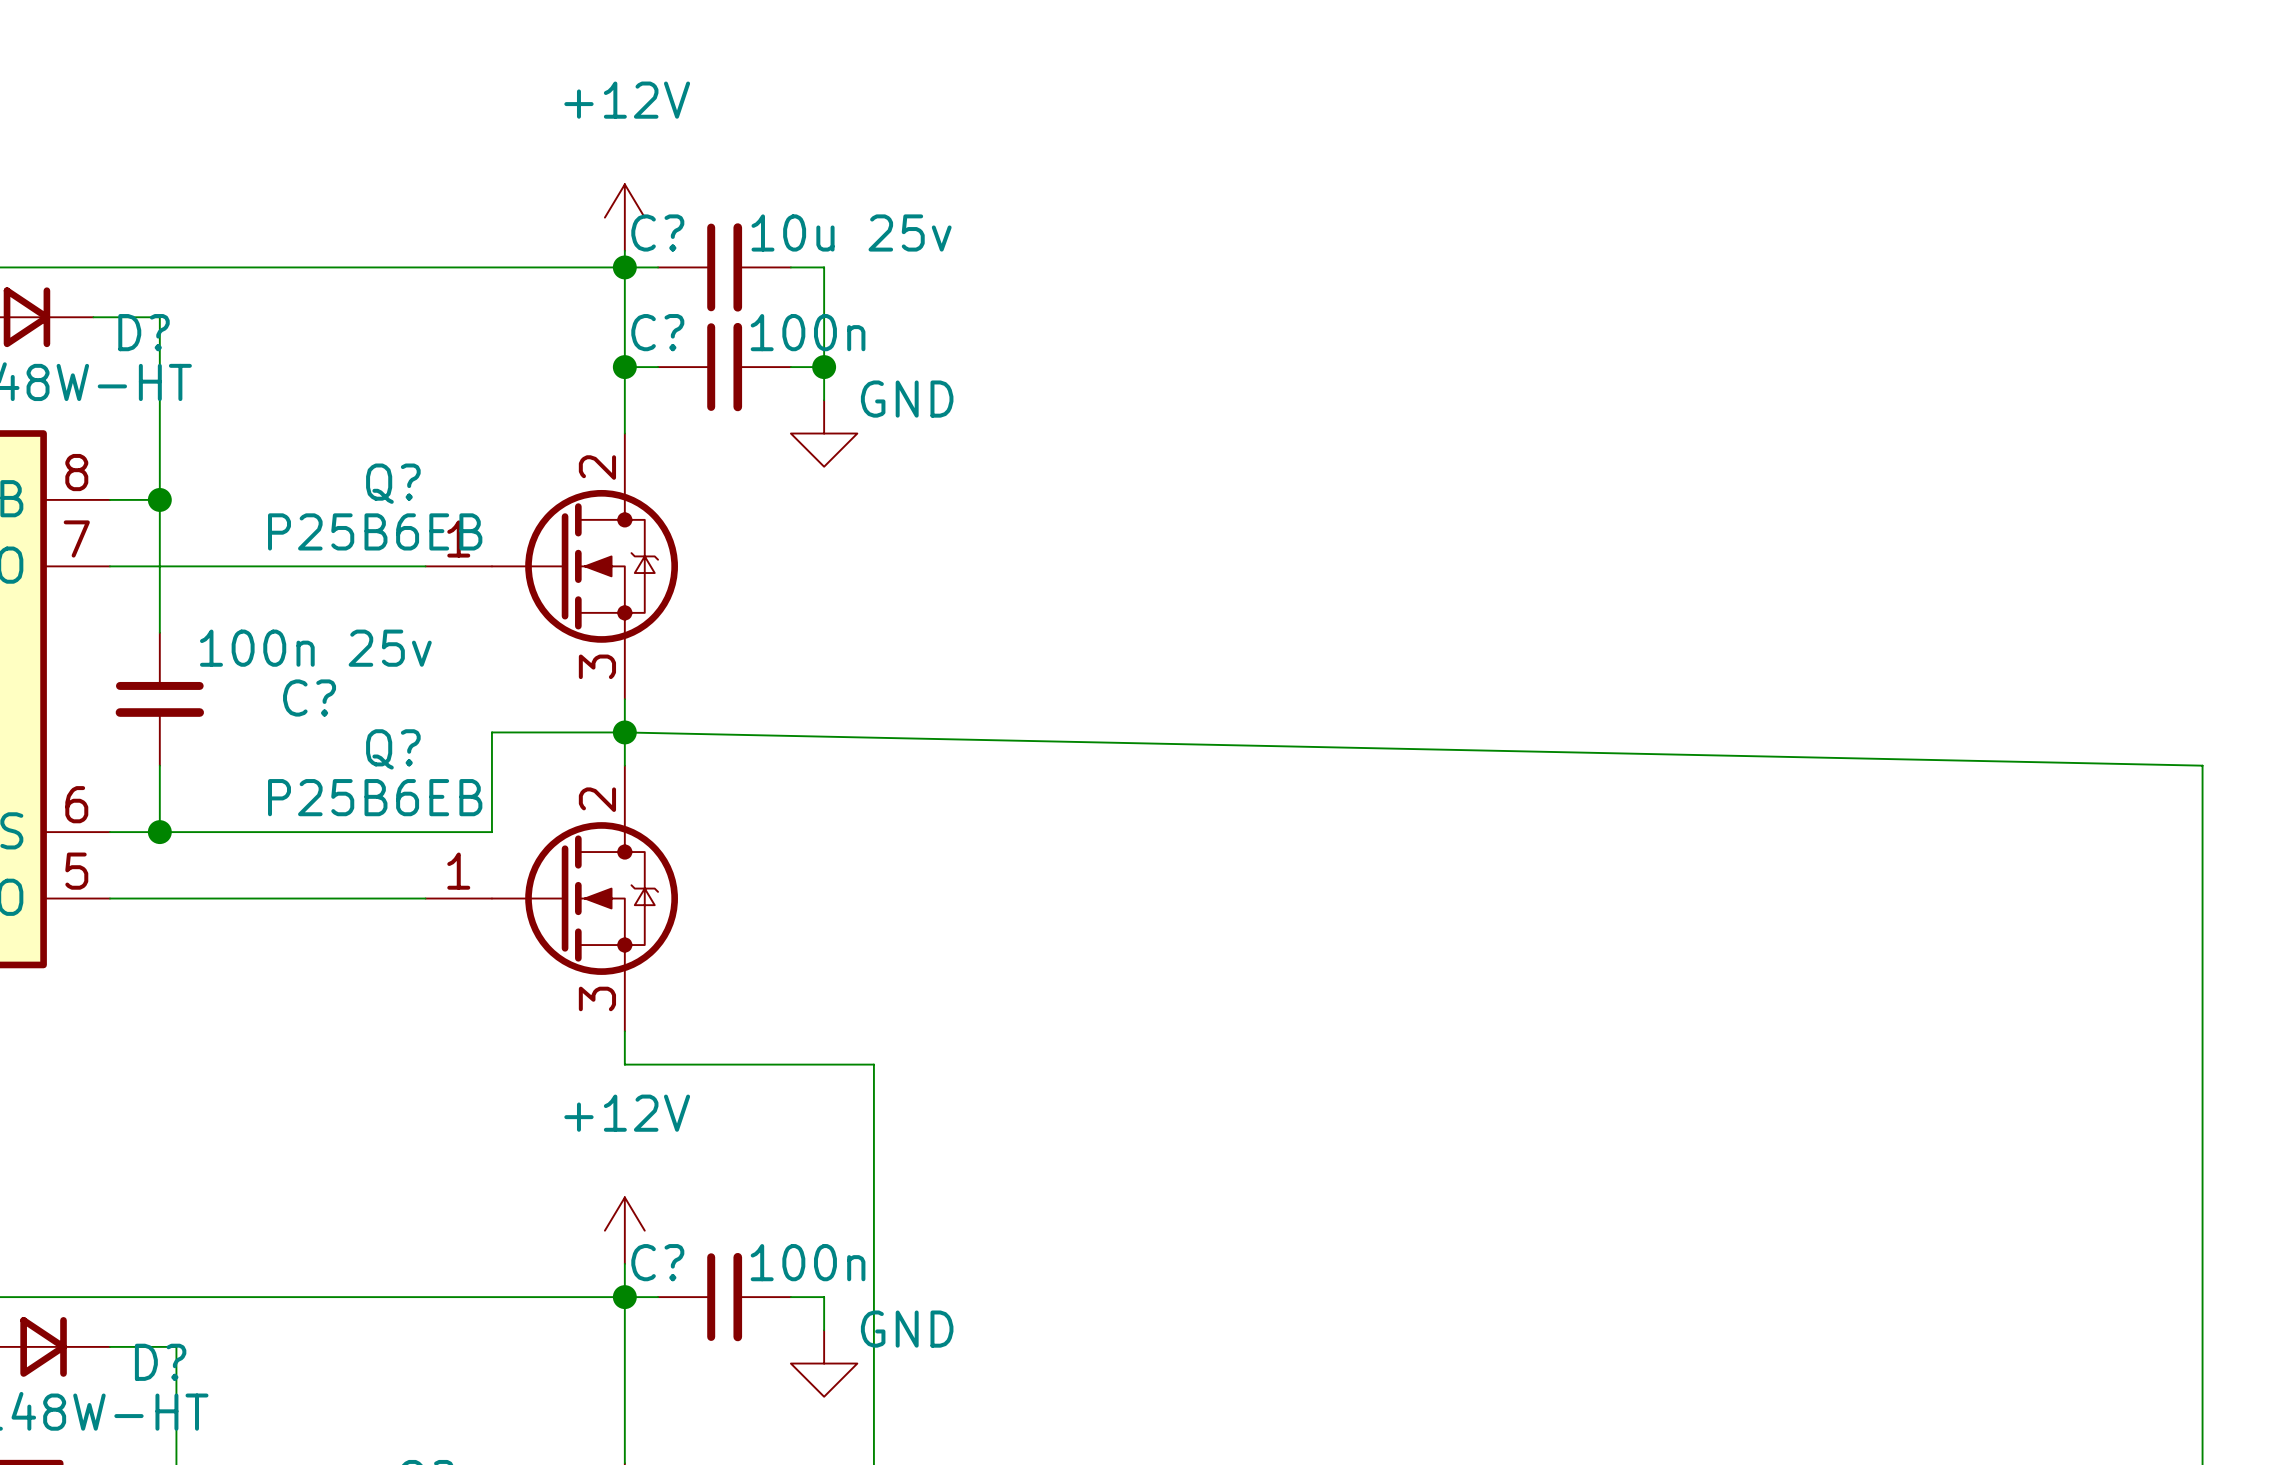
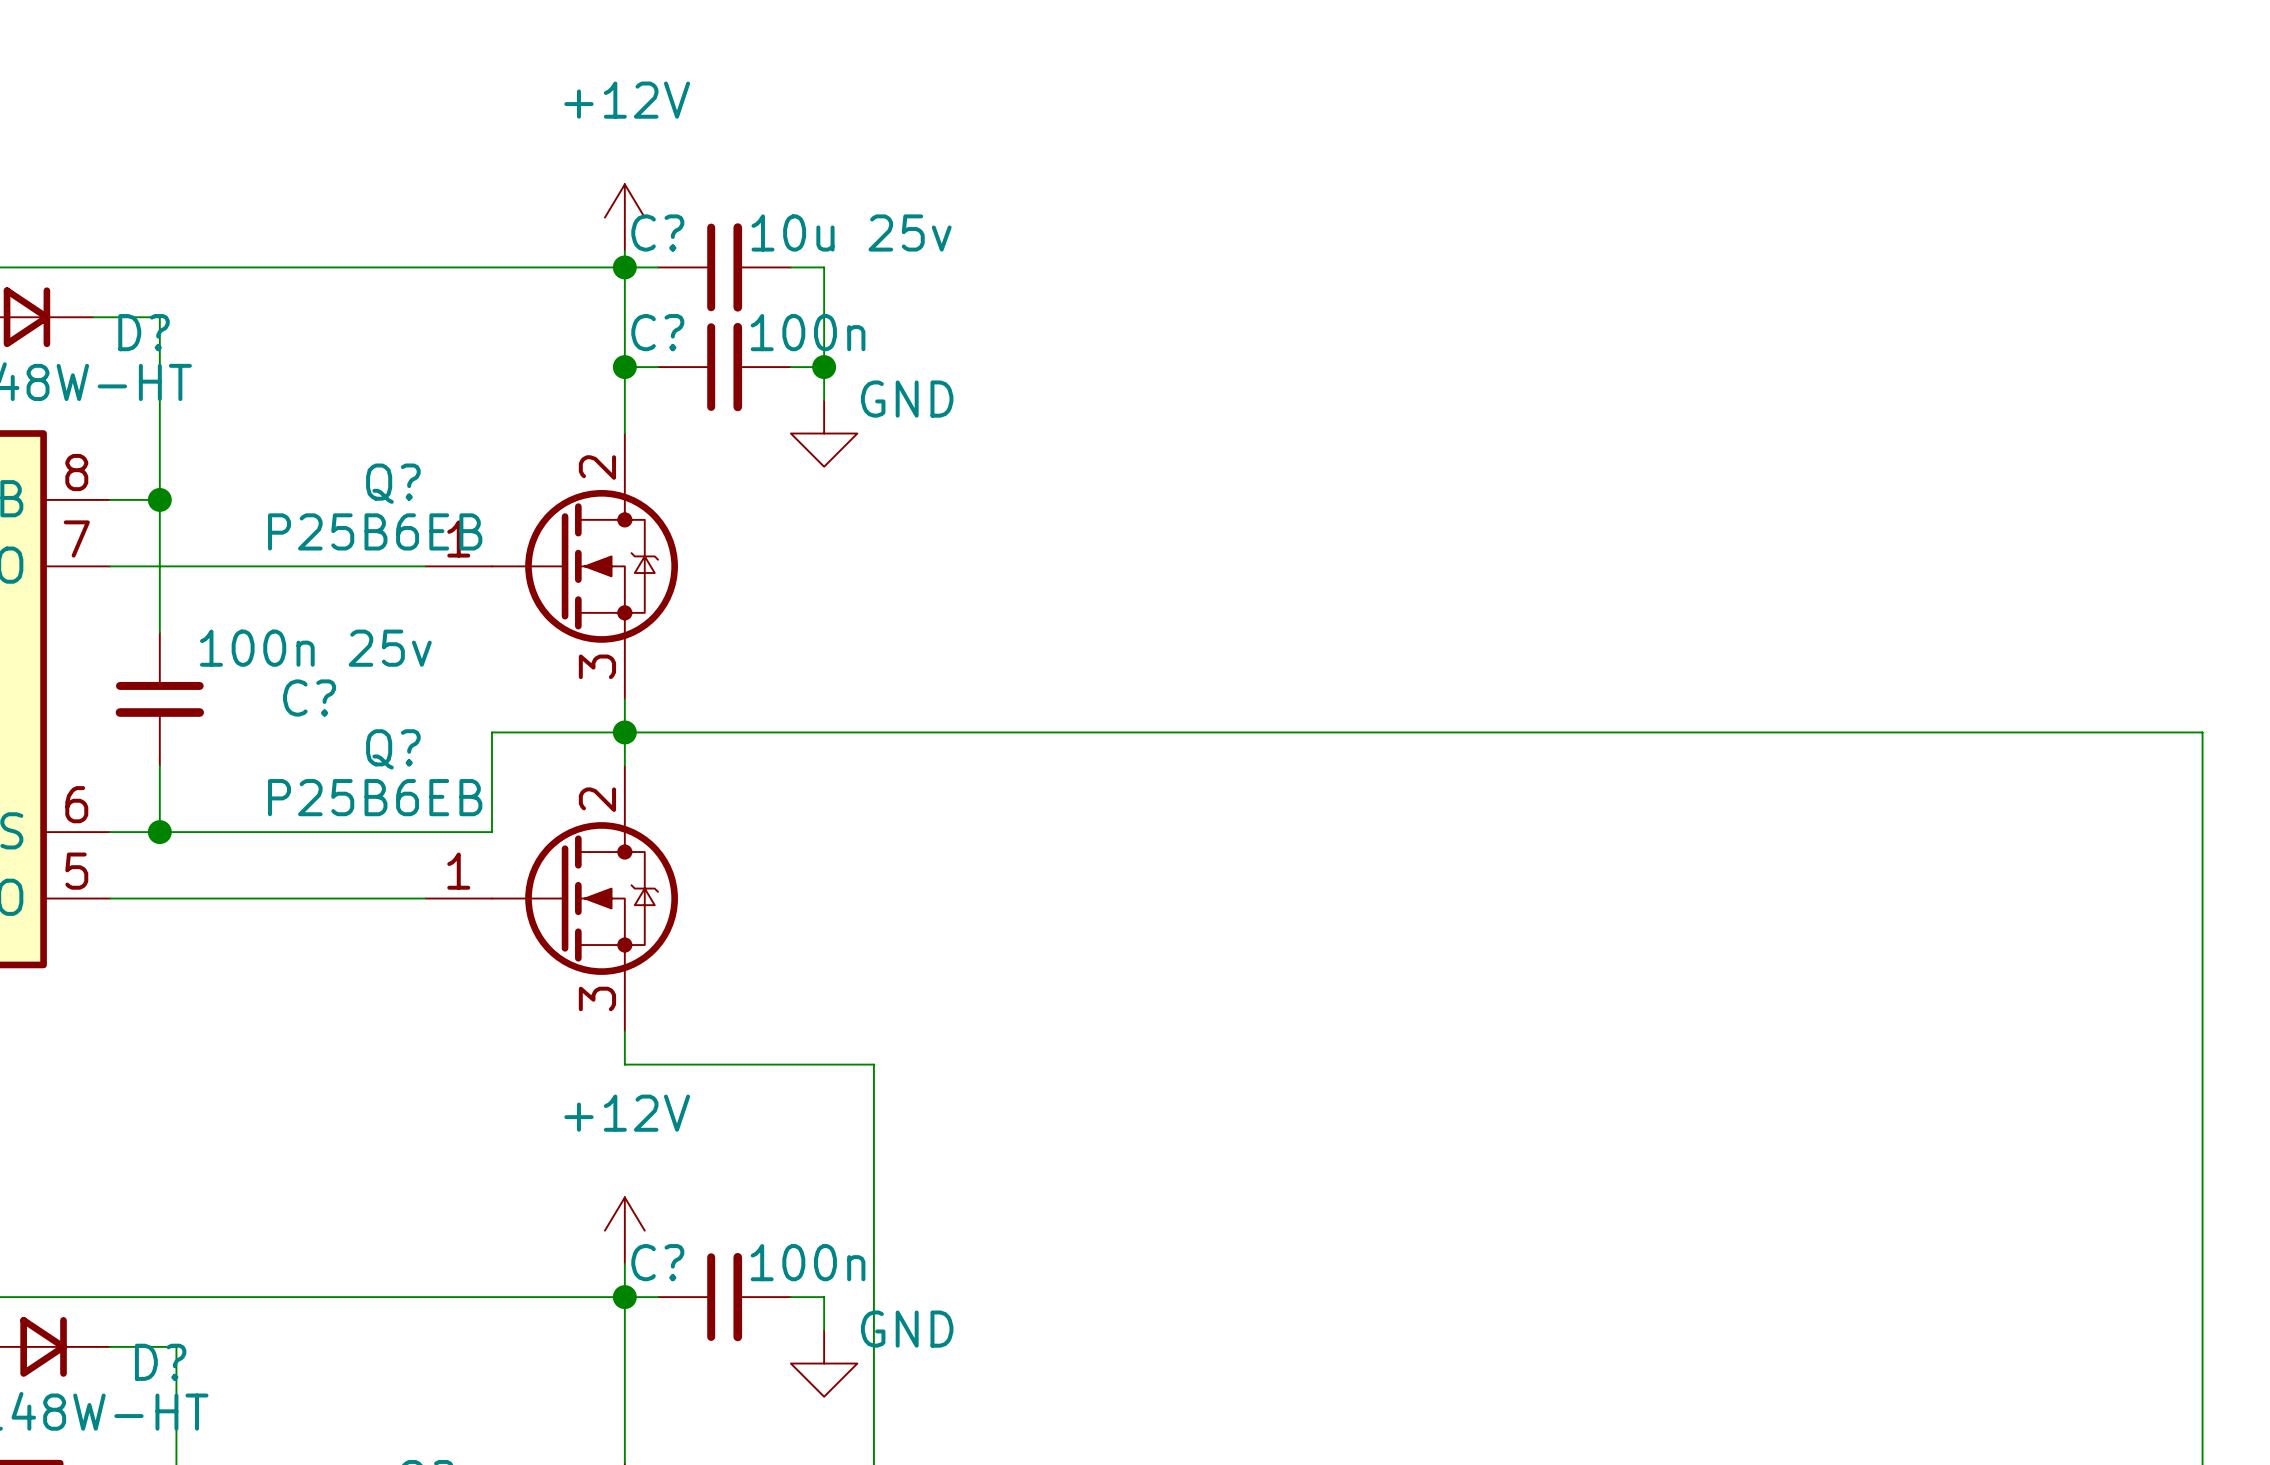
wire: (624, 732) (2202, 765) -> (624, 732) (2202, 732) (2202, 765)

